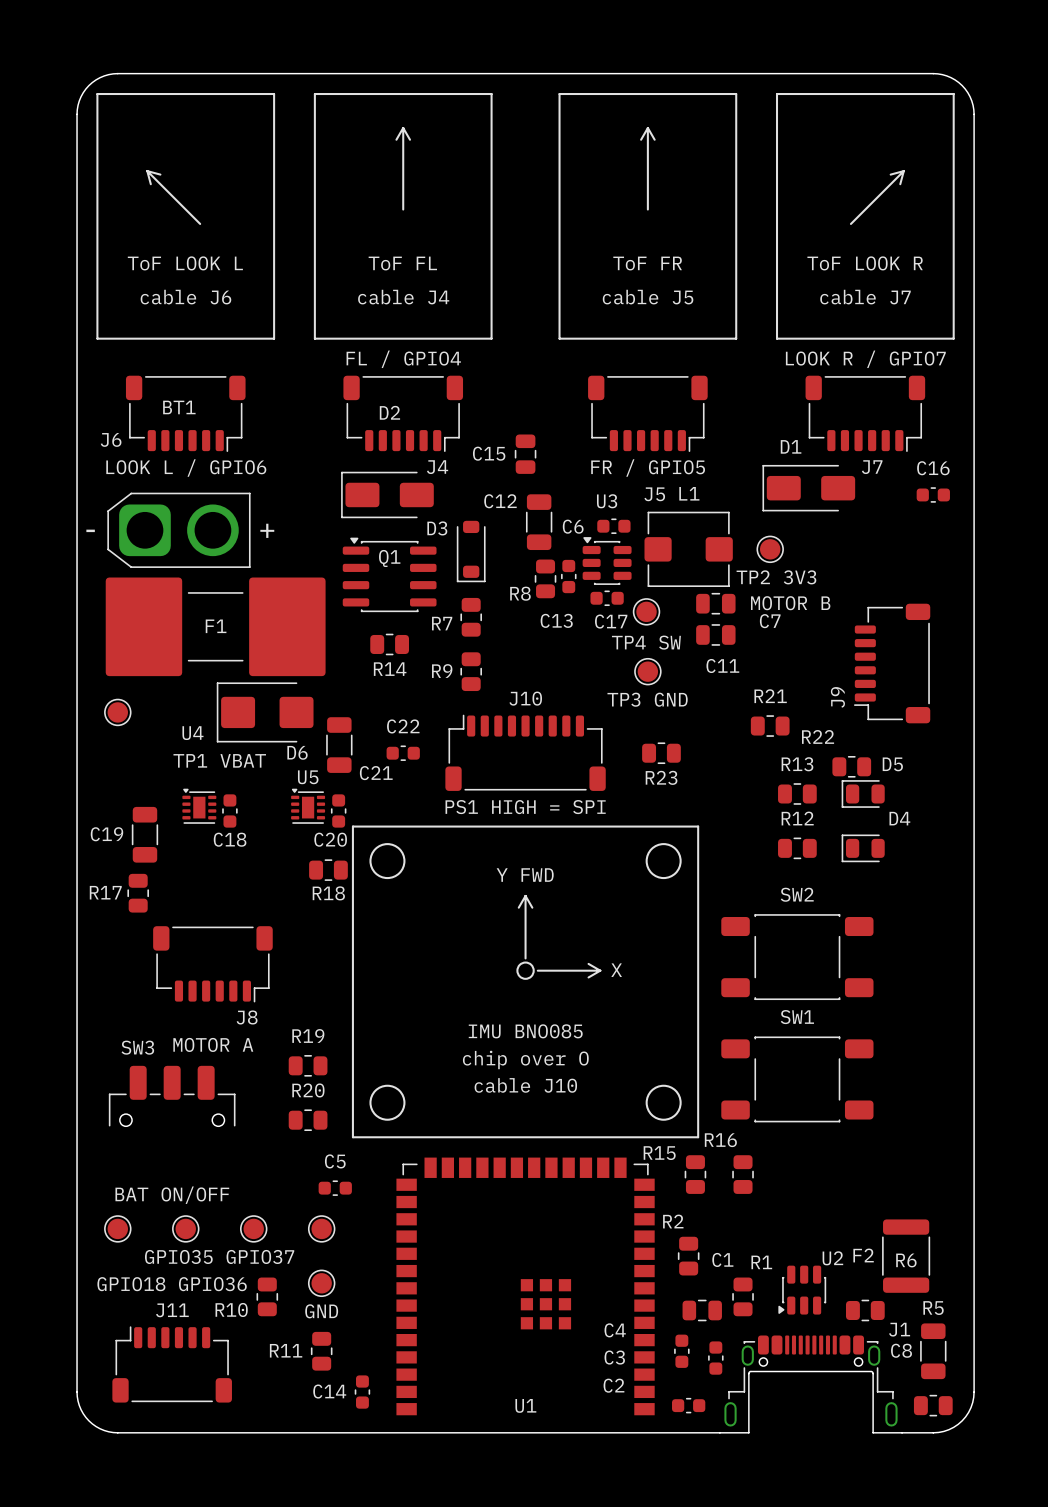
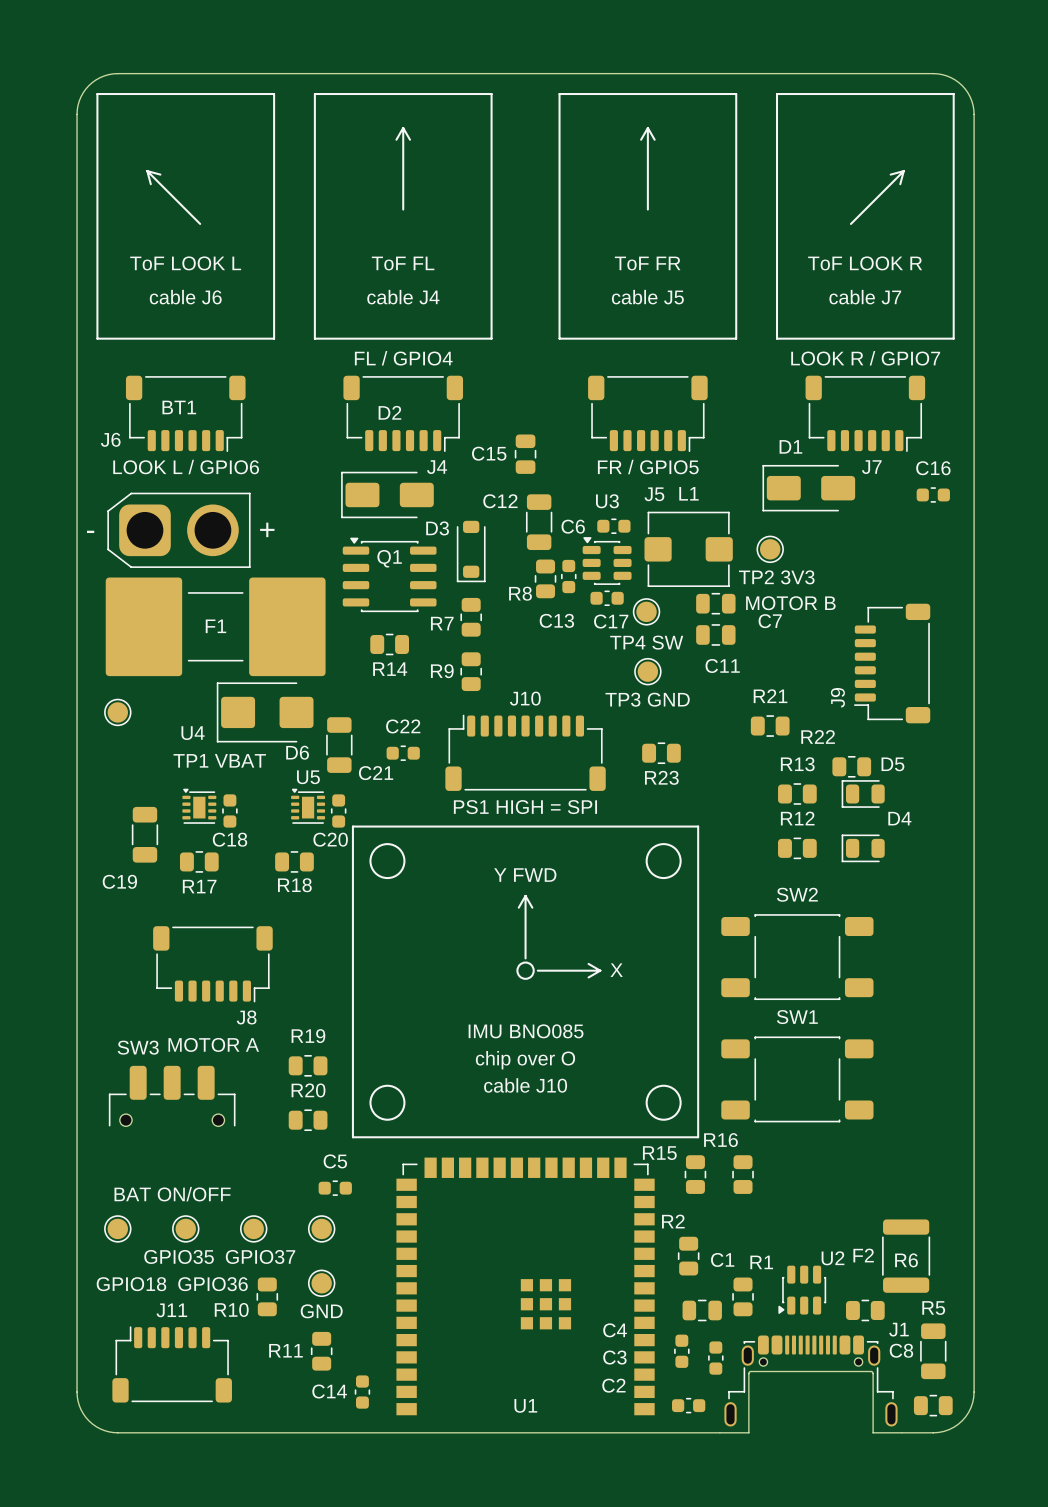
C19 name position: C19 (106, 834) -> C19 (119, 881)
R18 position: (328, 870) -> (294, 861)
R17 name position: R17 (105, 892) -> R17 (199, 886)
R17 rotation: 0° (138, 893) -> 90° clockwise (199, 861)
R17 position: (138, 893) -> (199, 861)

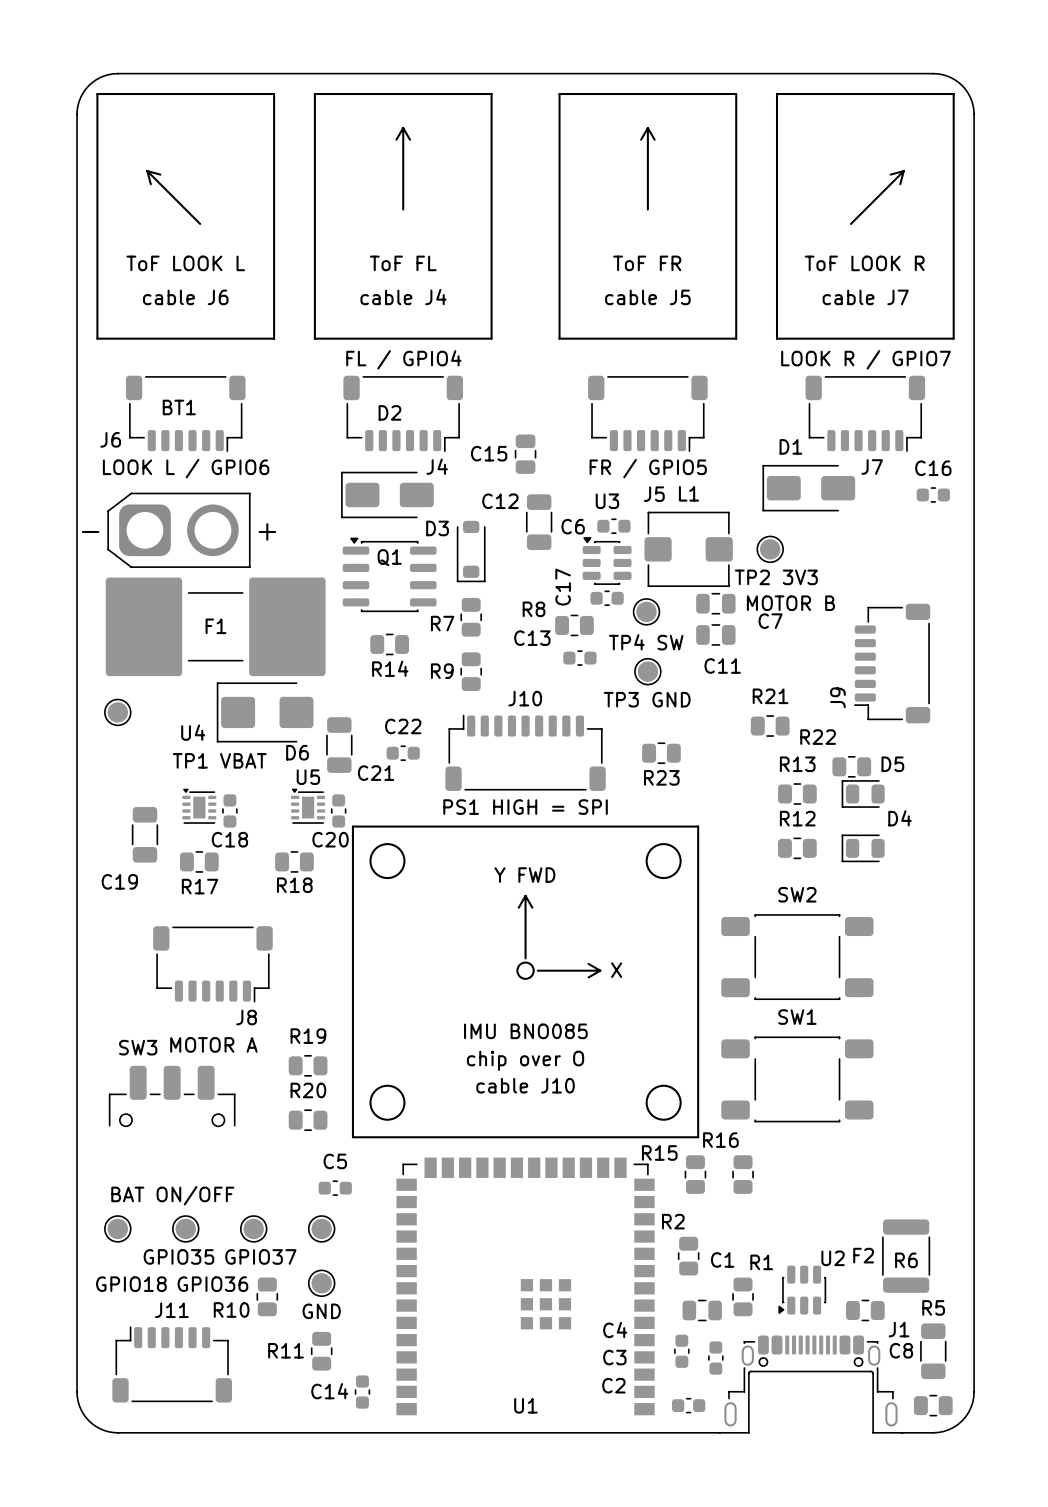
C13 rotation: 0° (568, 576) -> 90° clockwise (579, 658)
C13 position: (568, 576) -> (579, 658)
R8 rotation: 0° (545, 578) -> 90° clockwise (574, 625)
R8 position: (545, 578) -> (574, 625)
C17 name rotation: 0° (611, 621) -> 90° counterclockwise (563, 587)
C17 name position: C17 (611, 621) -> C17 (563, 587)

